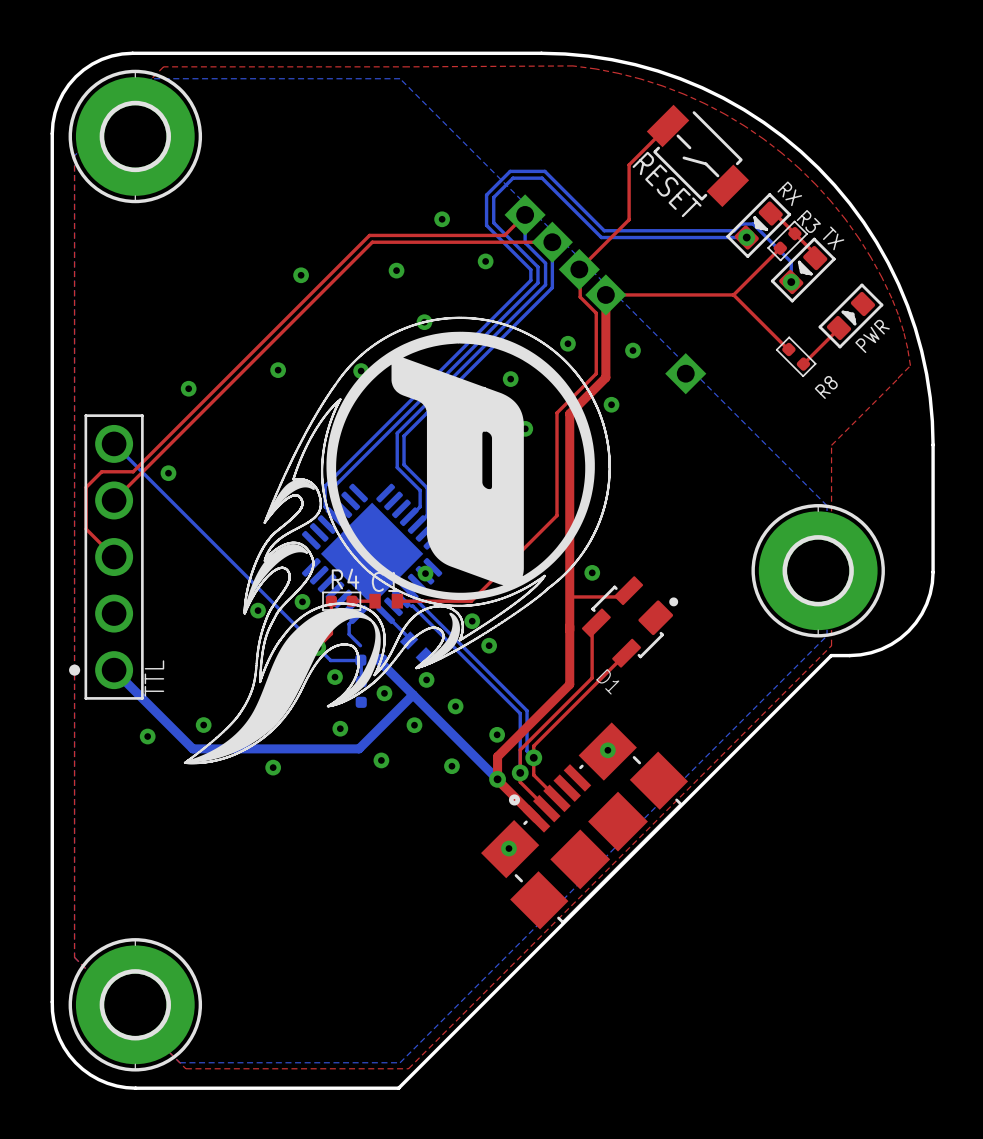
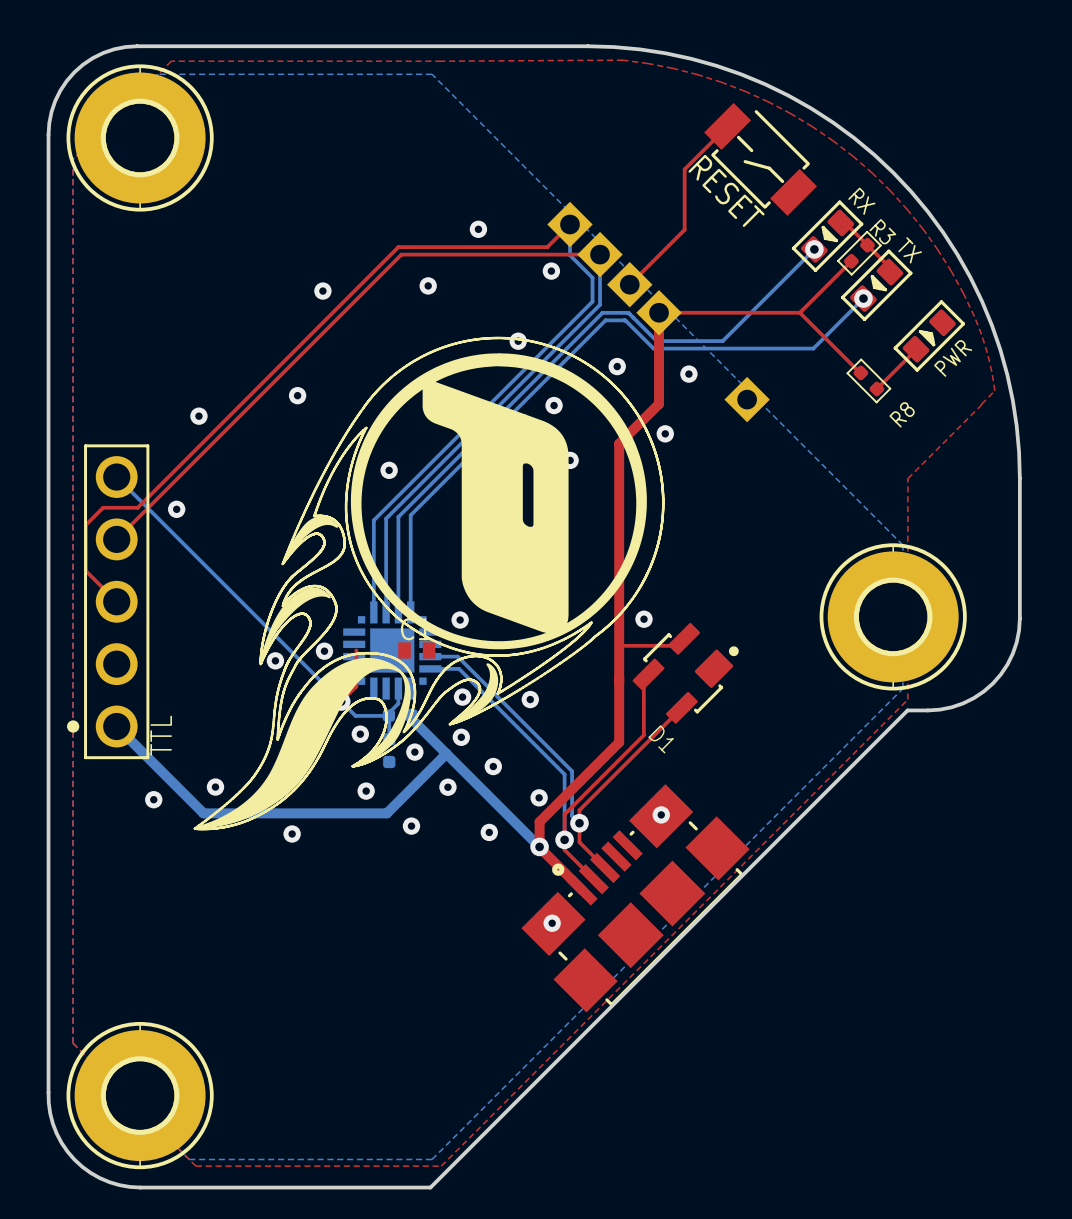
bottom track: (746, 237) (601, 237) (542, 178) (513, 178) (493, 197) (493, 222) (537, 267) (537, 282) (335, 485) (335, 501) (342, 508) -> (814, 249) (722, 341) (656, 341) (628, 313) (602, 312) (398, 516) (398, 612)
via position: (485, 261) -> (551, 271)
top track: (579, 269) (580, 297) (596, 313) (596, 373) (557, 412) (557, 515) (471, 601) (397, 601) -> none
bottom track: (791, 282) (791, 262) (753, 224) (741, 224) (734, 230) (604, 230) (544, 171) (510, 171) (486, 195) (486, 225) (530, 269) (530, 280) (325, 486) (325, 506) (334, 516) -> (863, 298) (813, 348) (653, 348) (624, 320)
bottom track: none -> (624, 320) (605, 320) (410, 515) (410, 612)
via: none -> (518, 341)
via: (424, 322) -> none
via: (361, 371) -> none
bottom track: (397, 433) (397, 467) (420, 490) (420, 506) (409, 516) -> (428, 465) (373, 520) (373, 612)
bottom track: (404, 436) (404, 464) (427, 488) (427, 515) (417, 524) -> (436, 468) (386, 518) (386, 612)
via: none -> (389, 470)
part: (372, 553) -> none
bottom track: (409, 591) (459, 643) -> (430, 656) (457, 656) (497, 696)
R4: (341, 601) -> none
top track: (352, 601) (375, 601) -> none
part: none -> (392, 650)
bottom track: (411, 606) (424, 617) -> (430, 668) (459, 668)
bottom track: (358, 614) (349, 624) (349, 634) (360, 645) -> none
bottom track: (385, 614) (409, 638) (409, 640) -> none
via position: (472, 621) -> (462, 697)
bottom track: none -> (398, 688) (398, 703) (388, 713)
part: (416, 648) -> none

